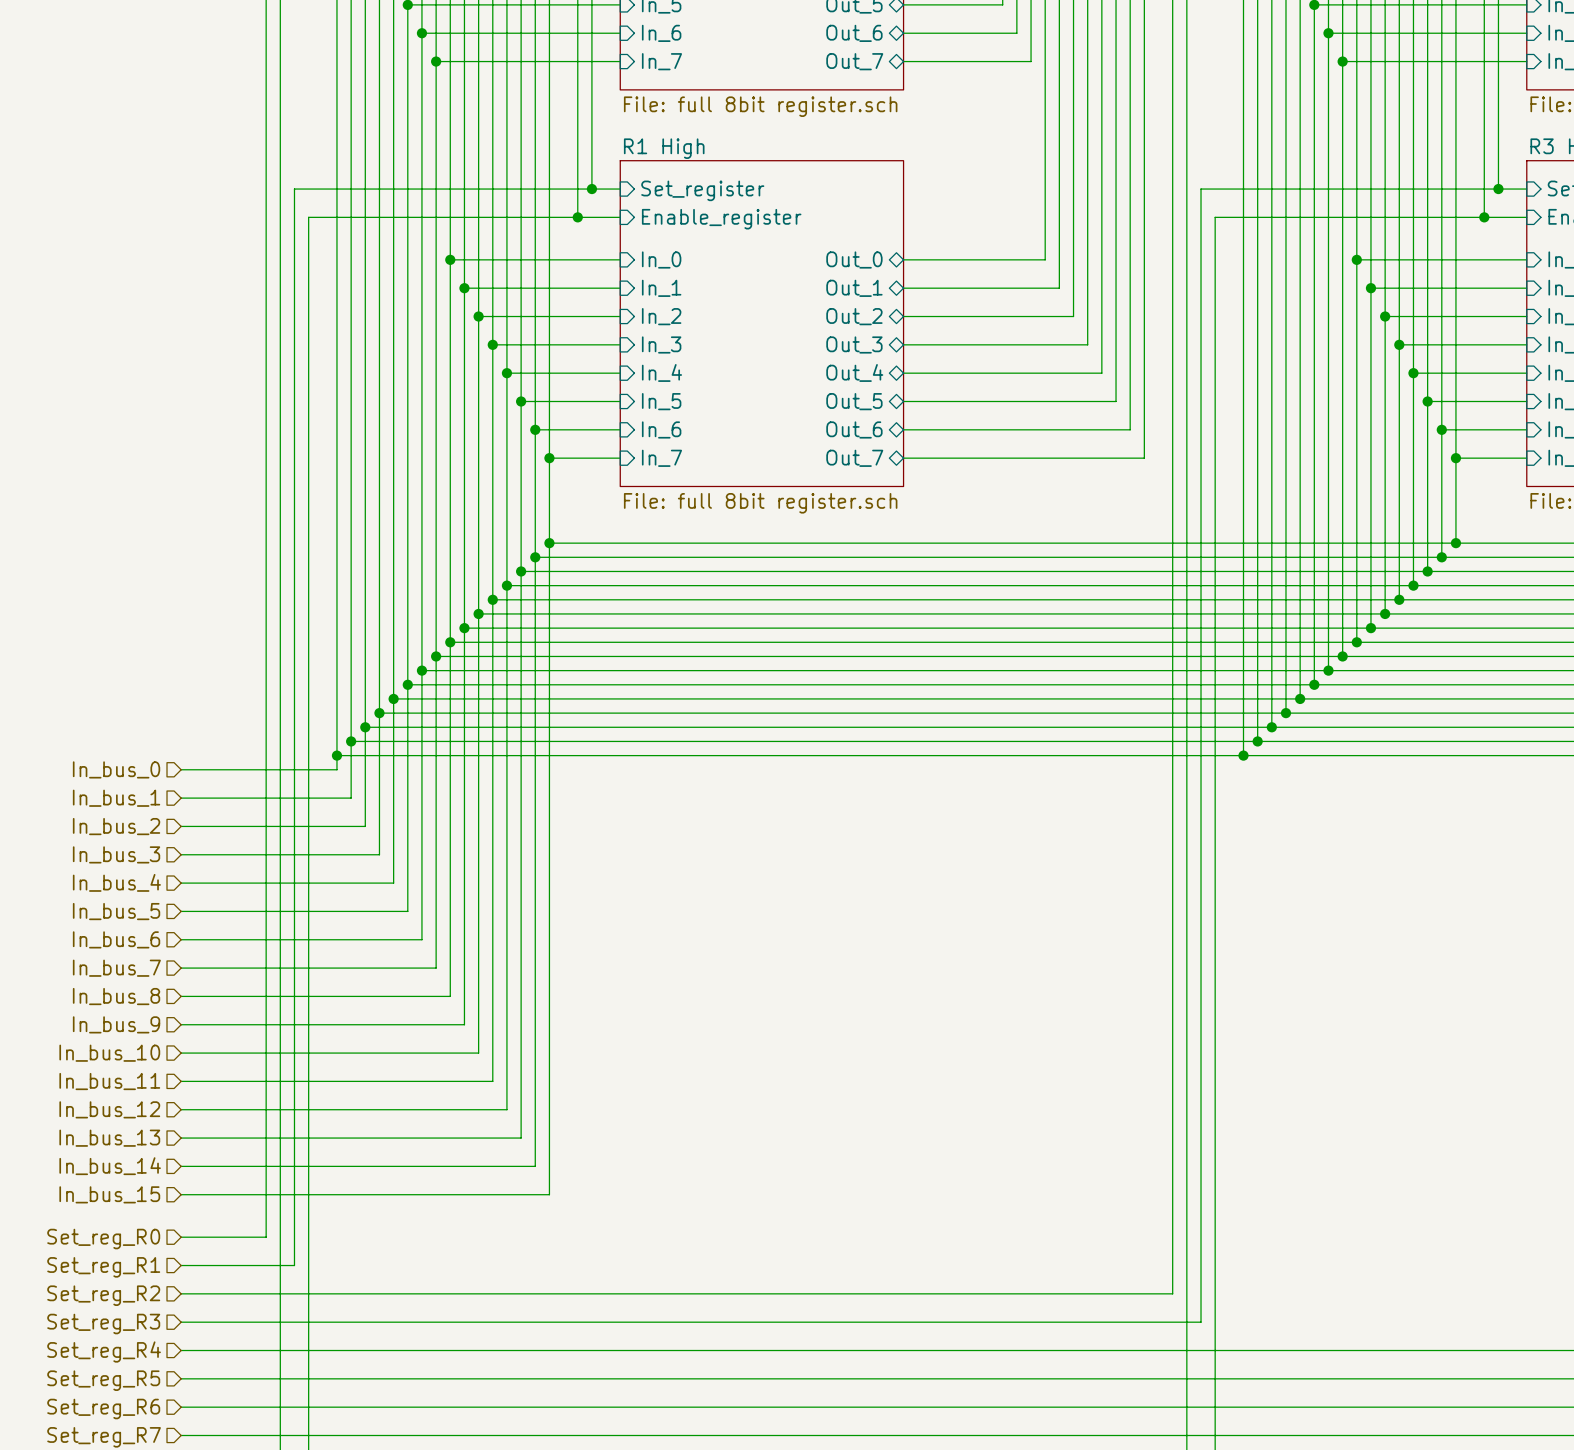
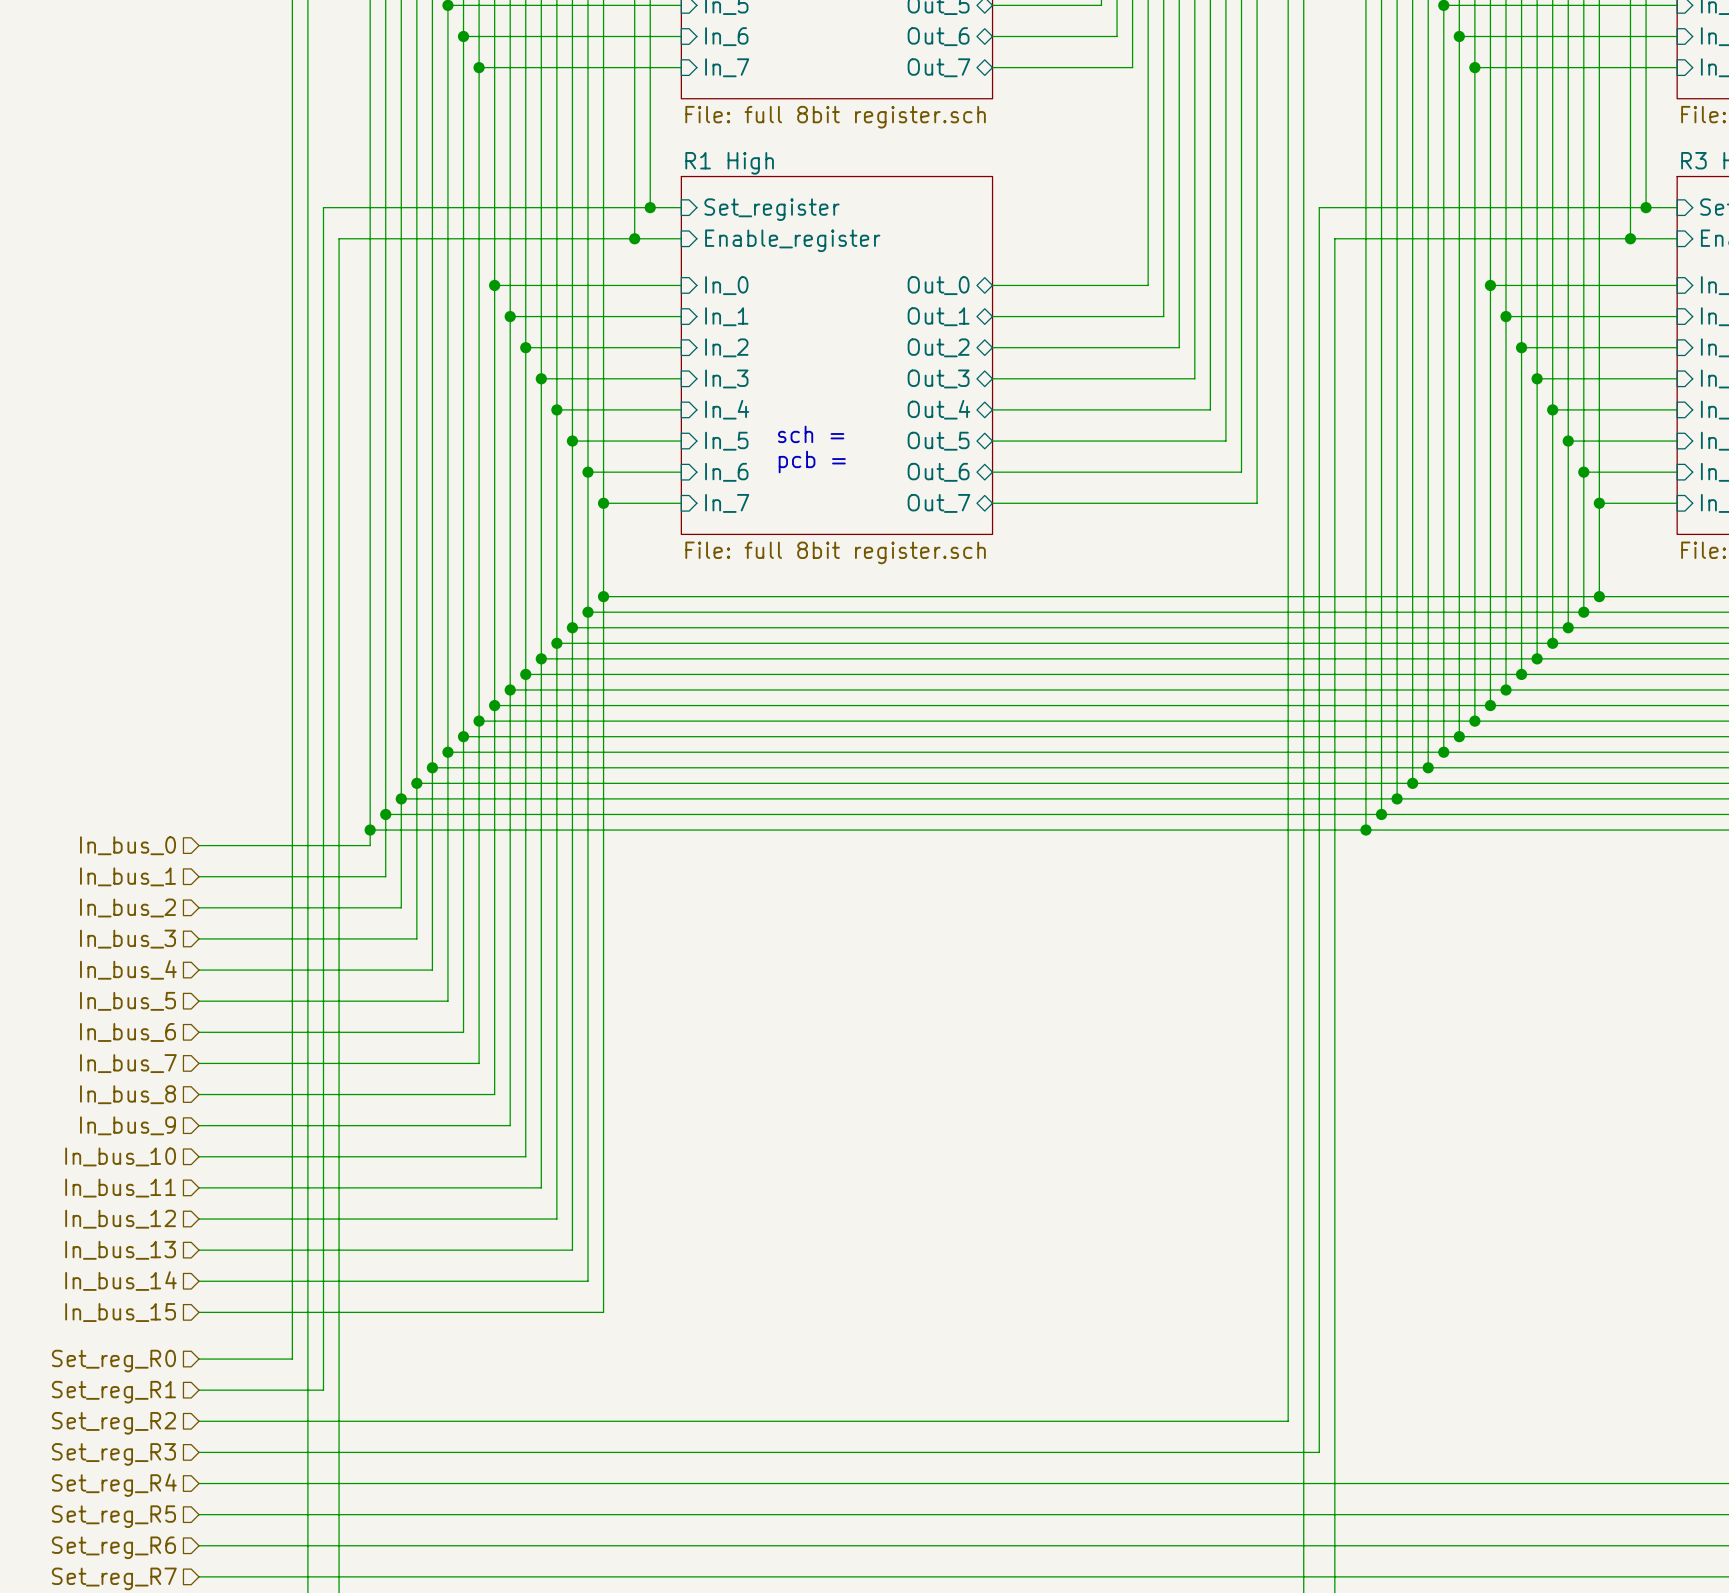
text: none -> sch = (811, 434)
text: none -> pcb = (812, 462)

